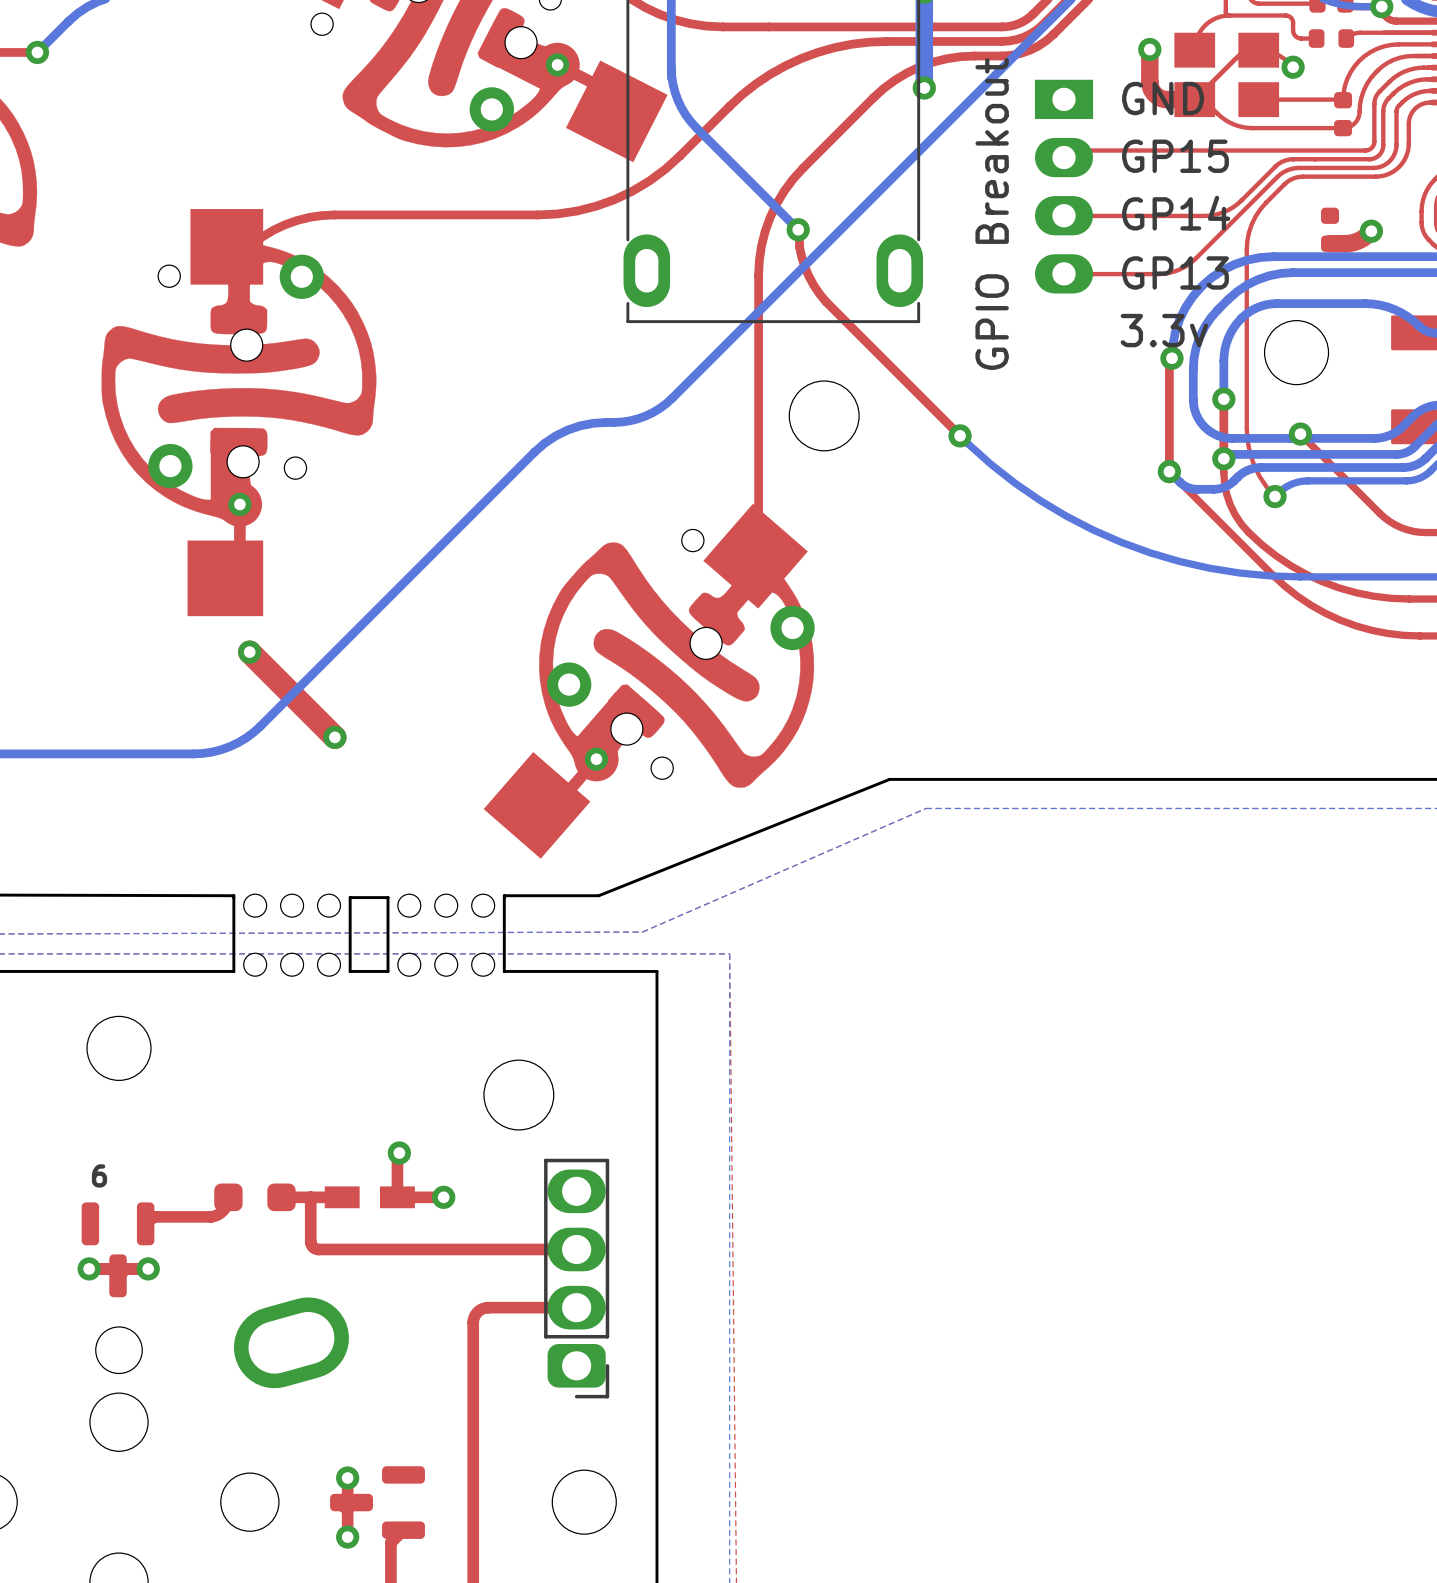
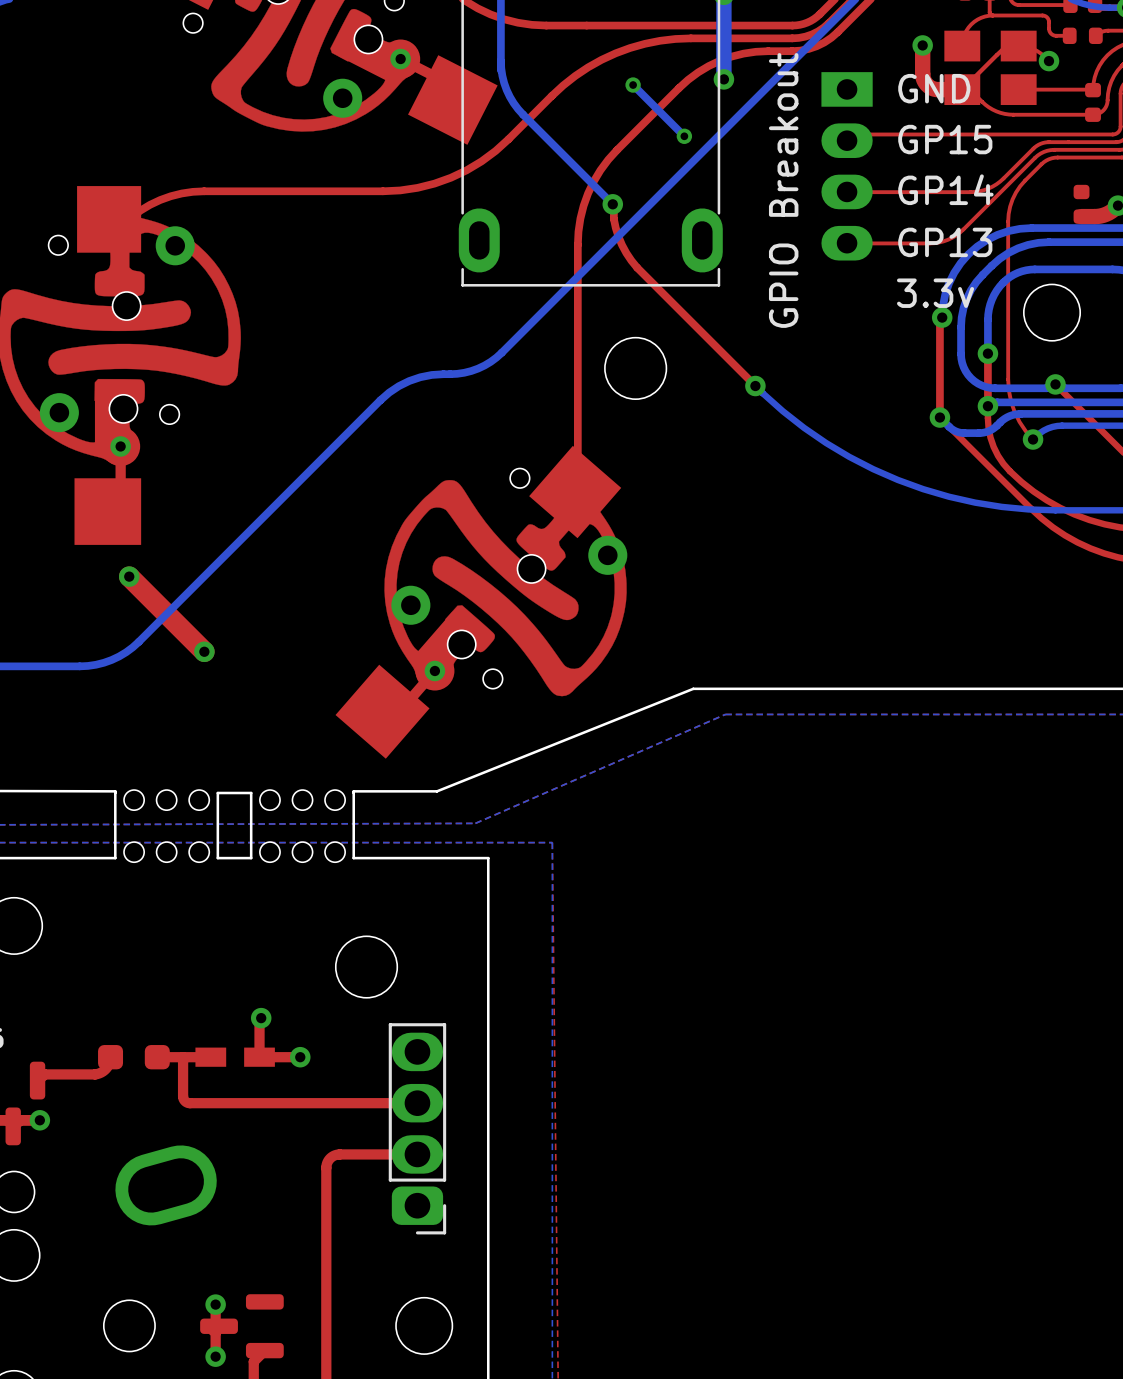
bottom track: none -> (633, 85) (684, 136)
via: none -> (633, 85)
via: none -> (684, 136)

